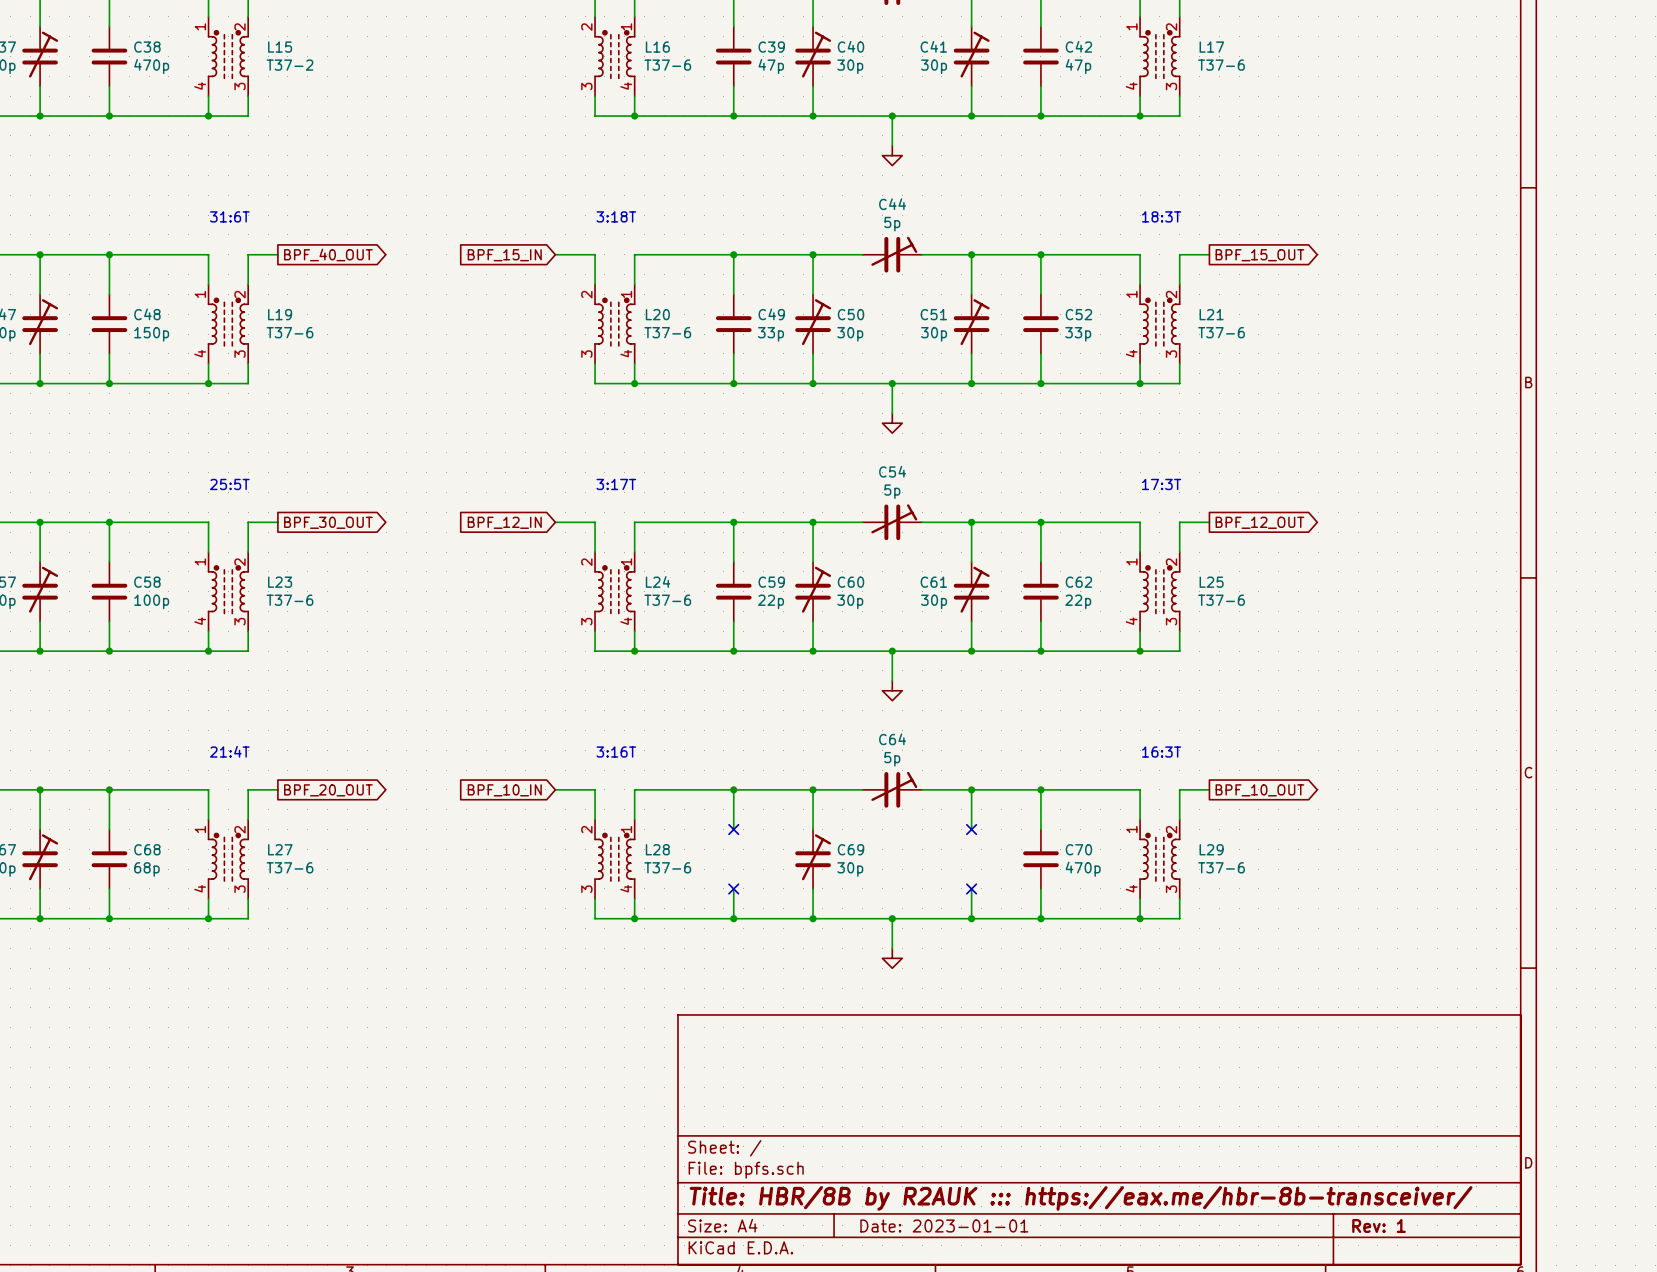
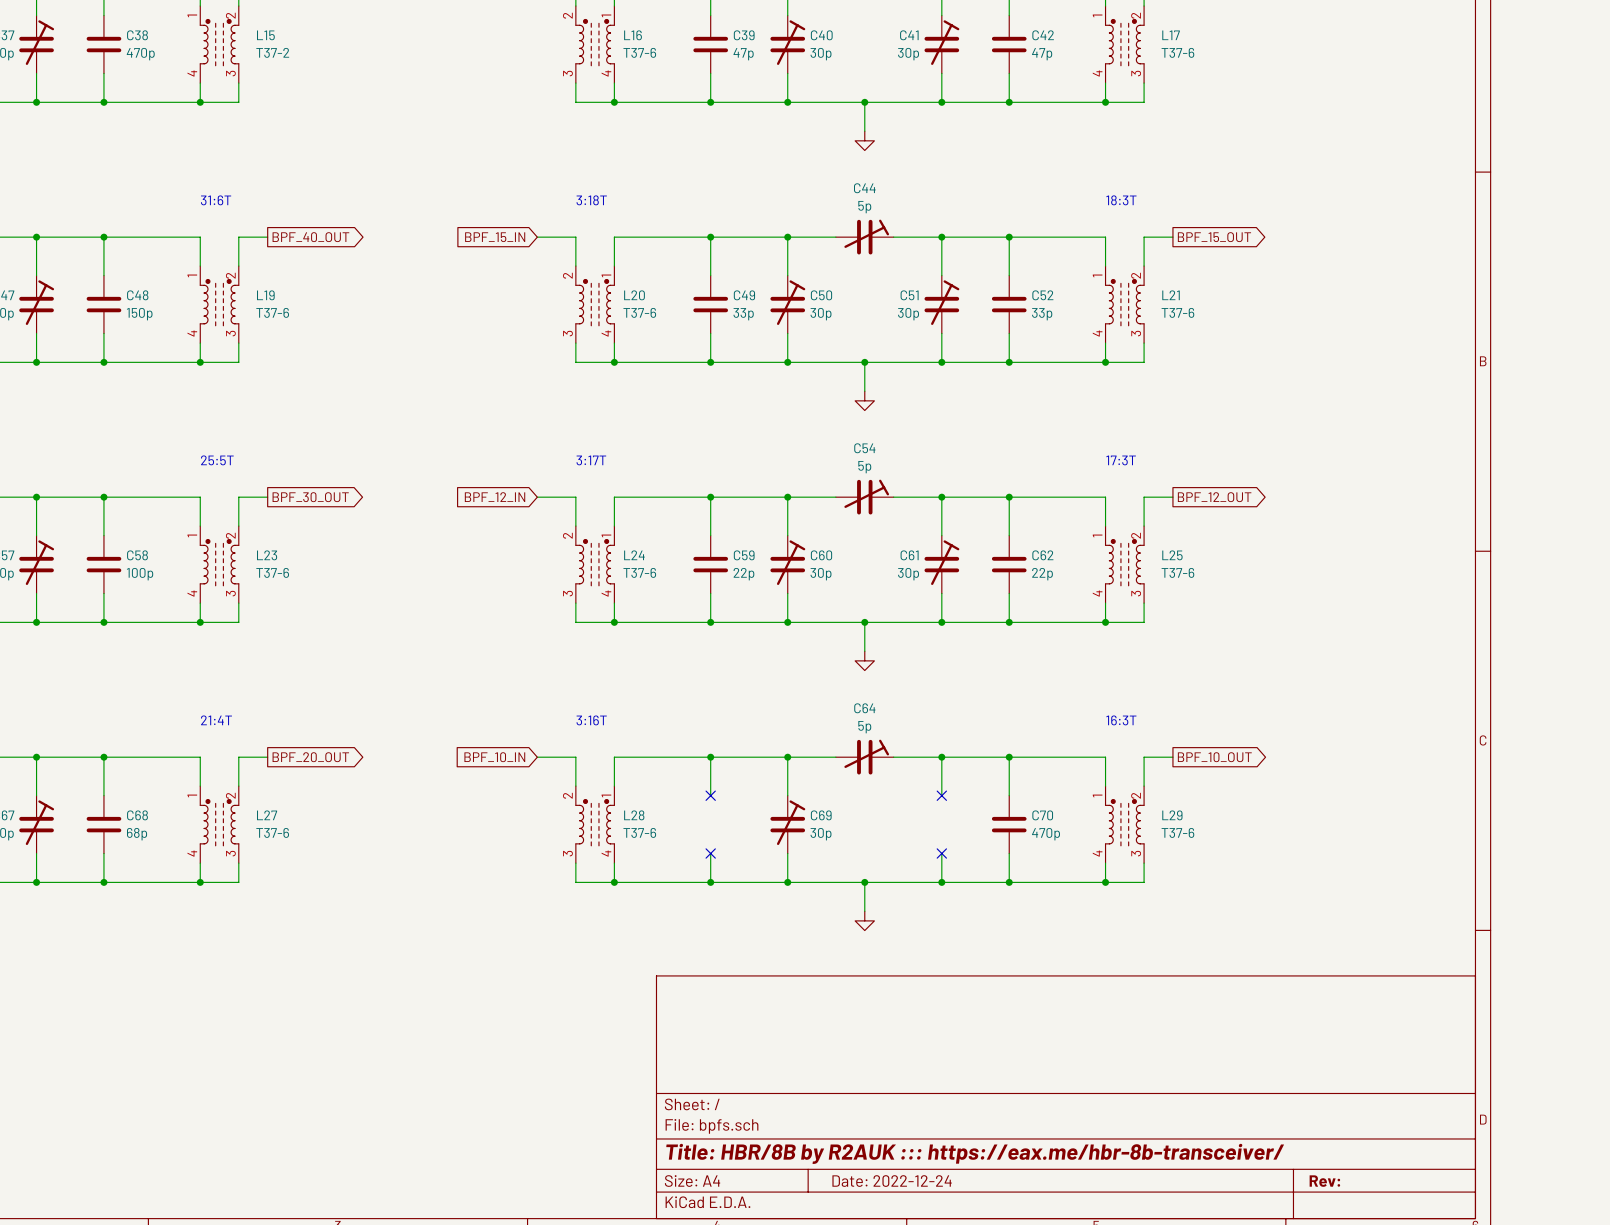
title block: Date: 2023-01-01 (944, 1226) -> Date: 2022-12-24 (892, 1181)
title block: Rev: 1 (1379, 1226) -> Rev: (1324, 1181)

